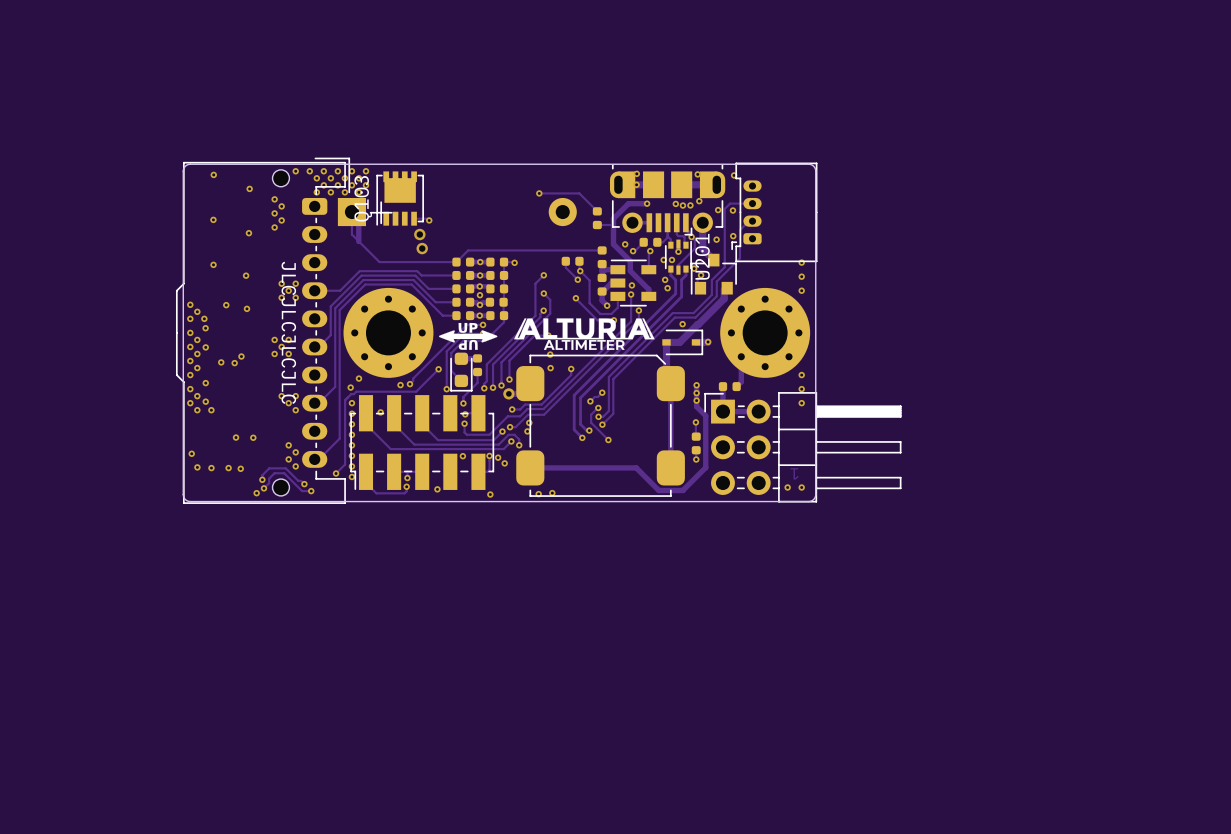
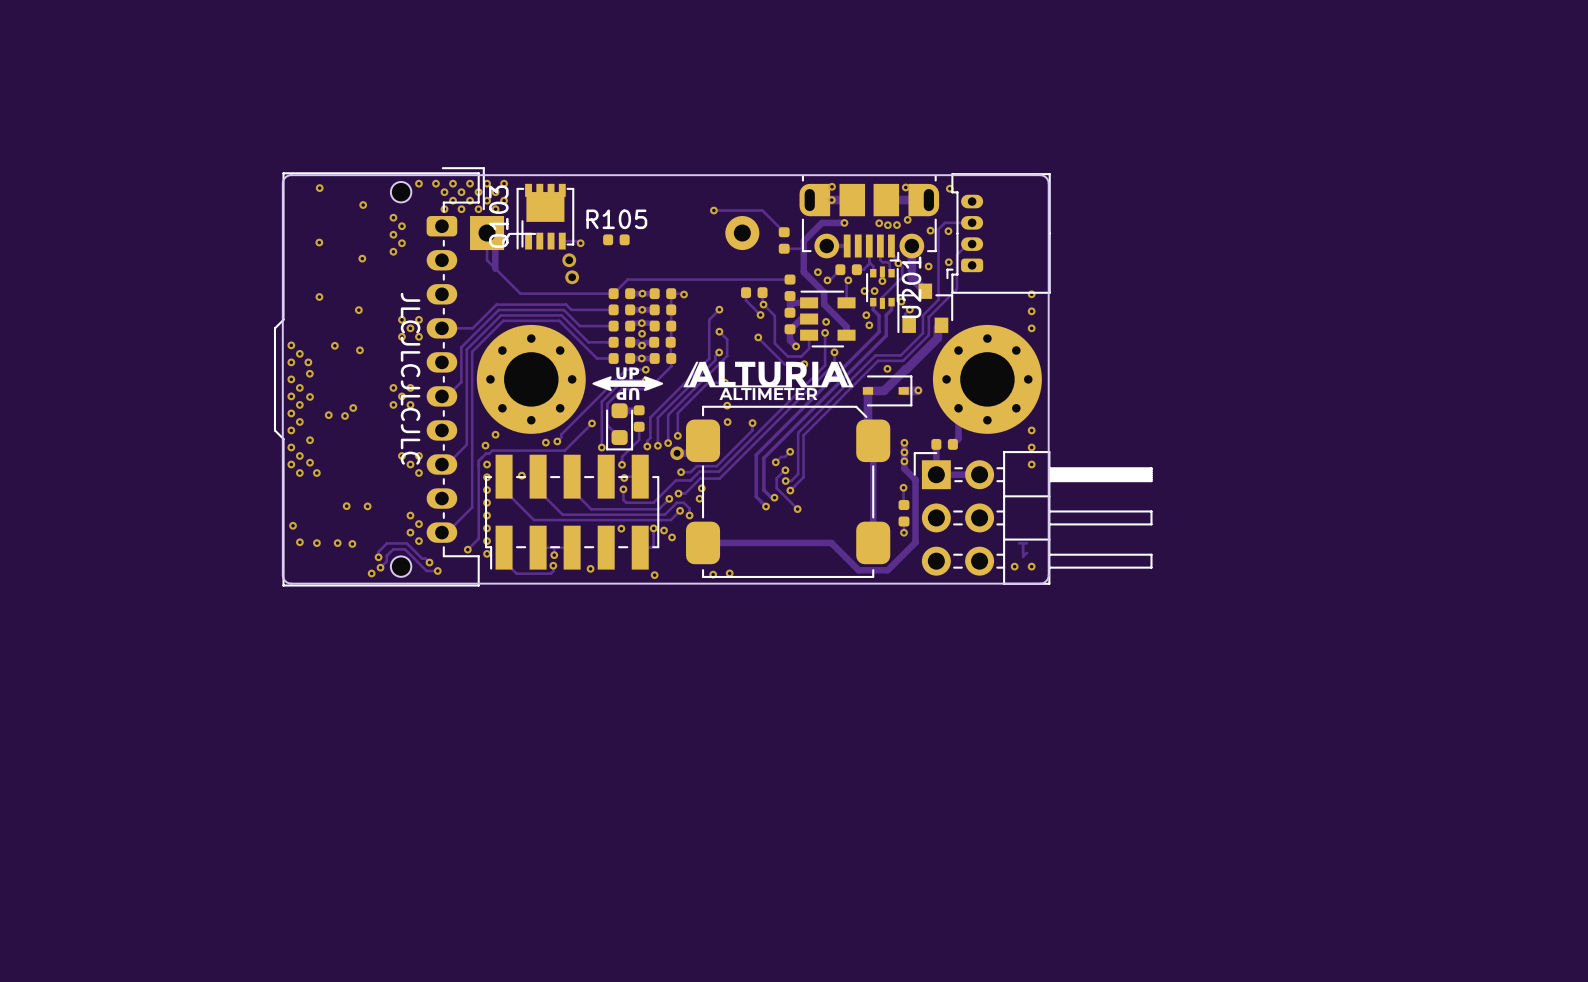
R105: none -> (616, 239)

